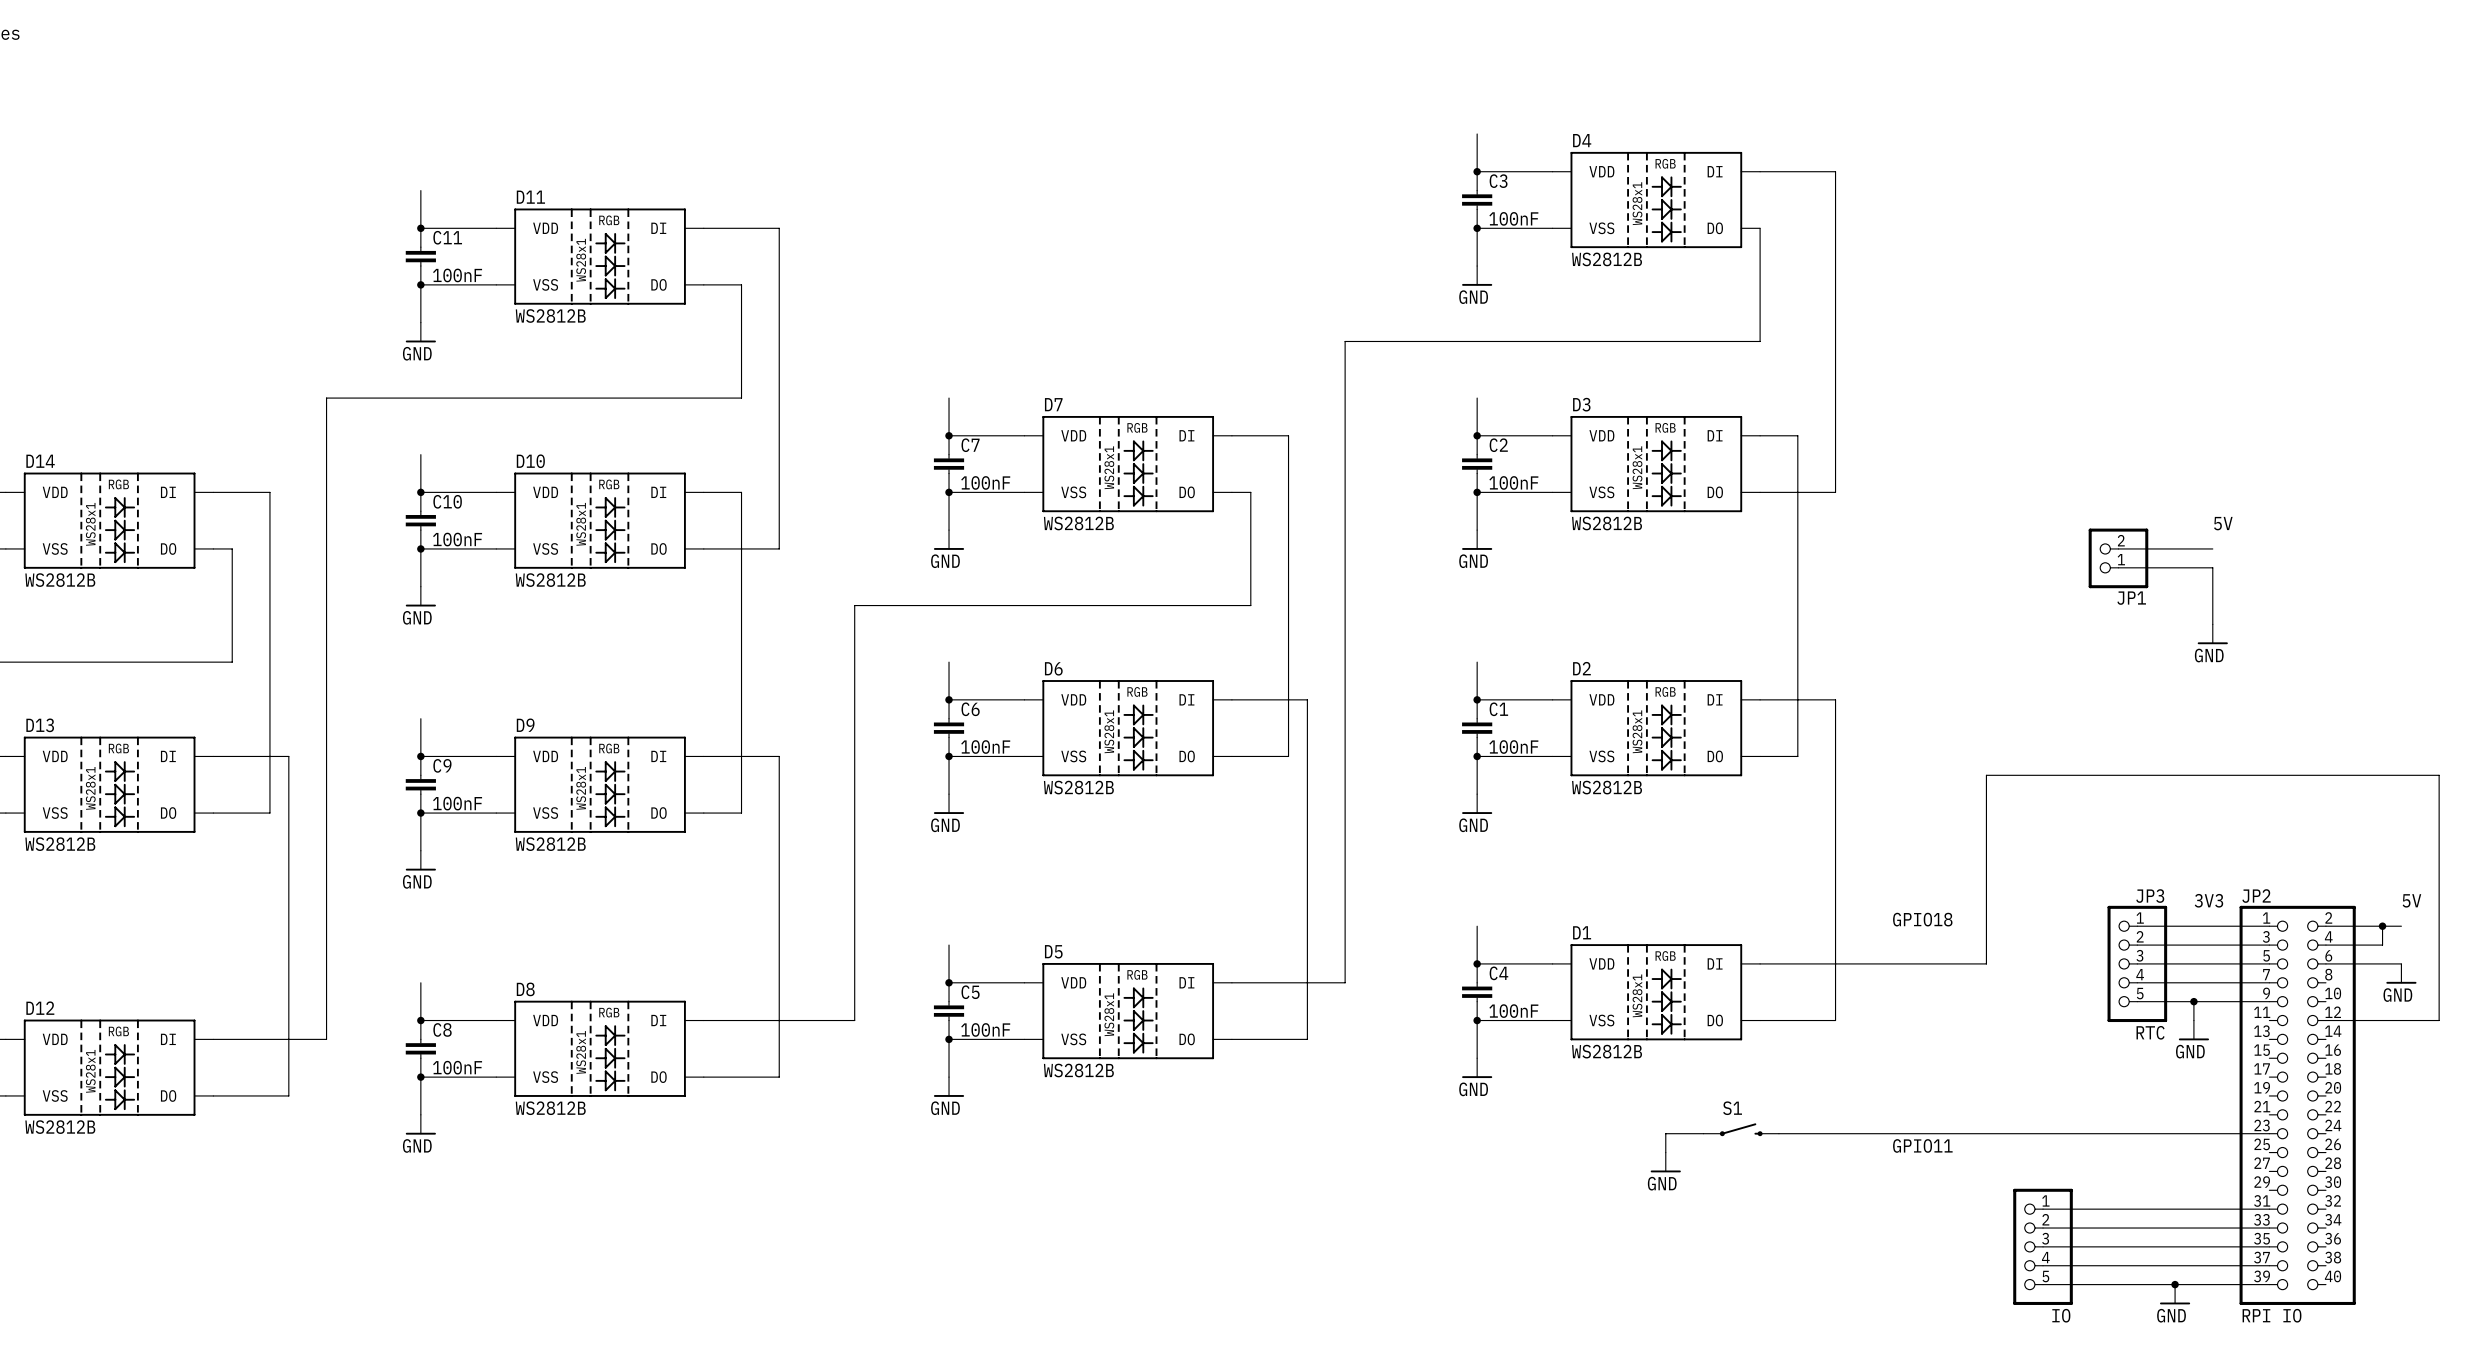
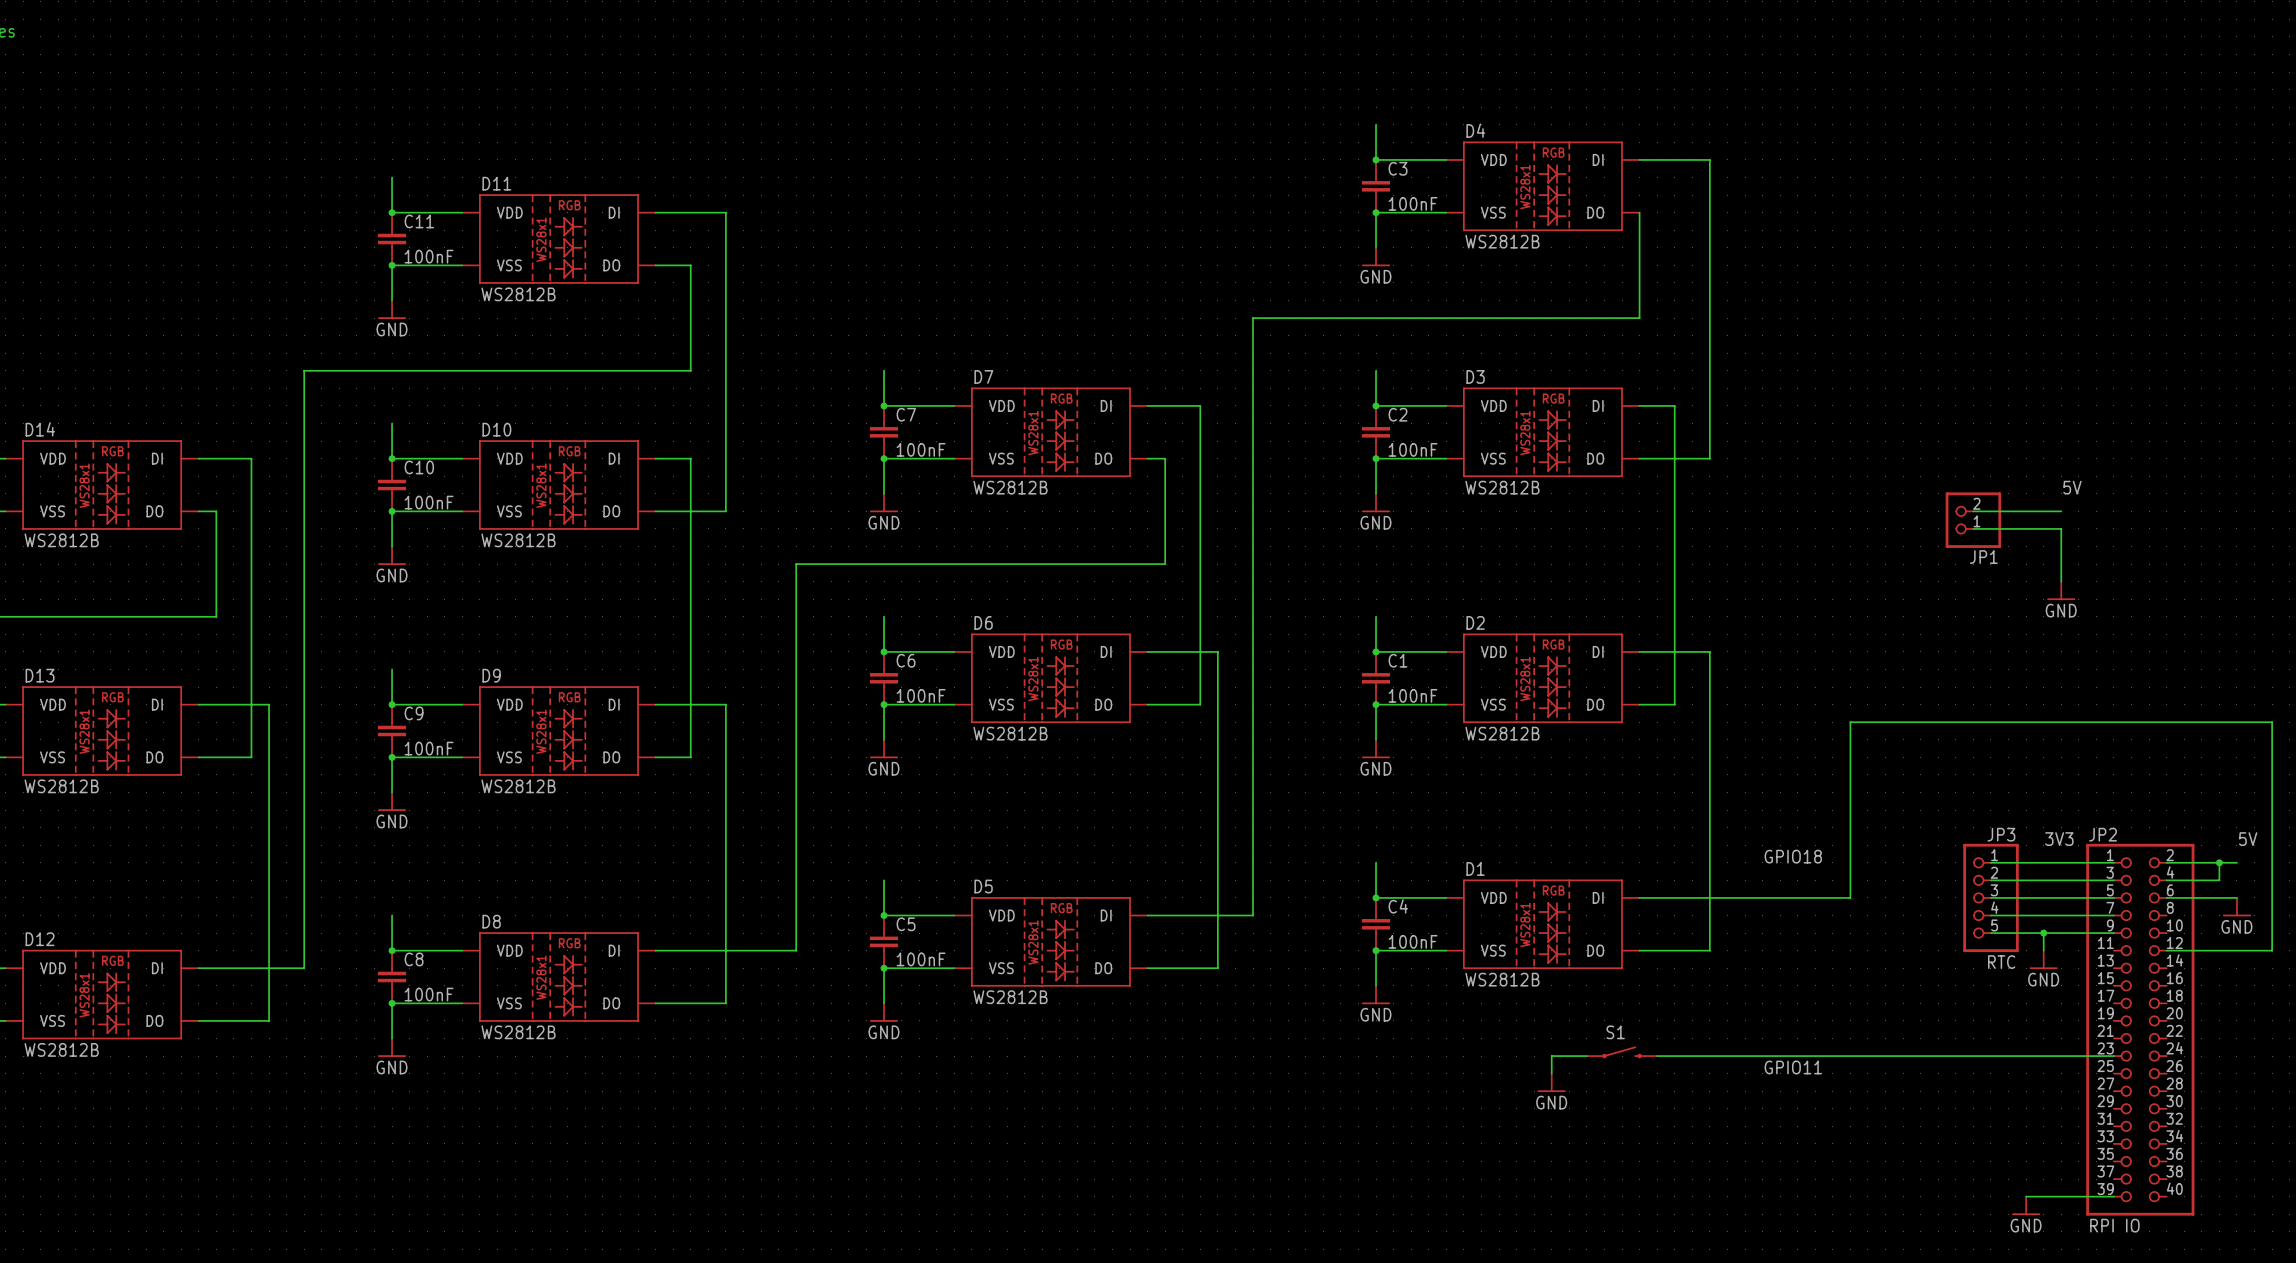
wire: (2043, 1209) (2269, 1209) -> none
wire: (2043, 1228) (2269, 1228) -> none
wire: (2043, 1246) (2269, 1246) -> none
part: IO (2043, 1246) -> none
wire: (2043, 1265) (2269, 1265) -> none
wire: (2043, 1284) (2175, 1284) -> none
junction: (2175, 1284) -> none

